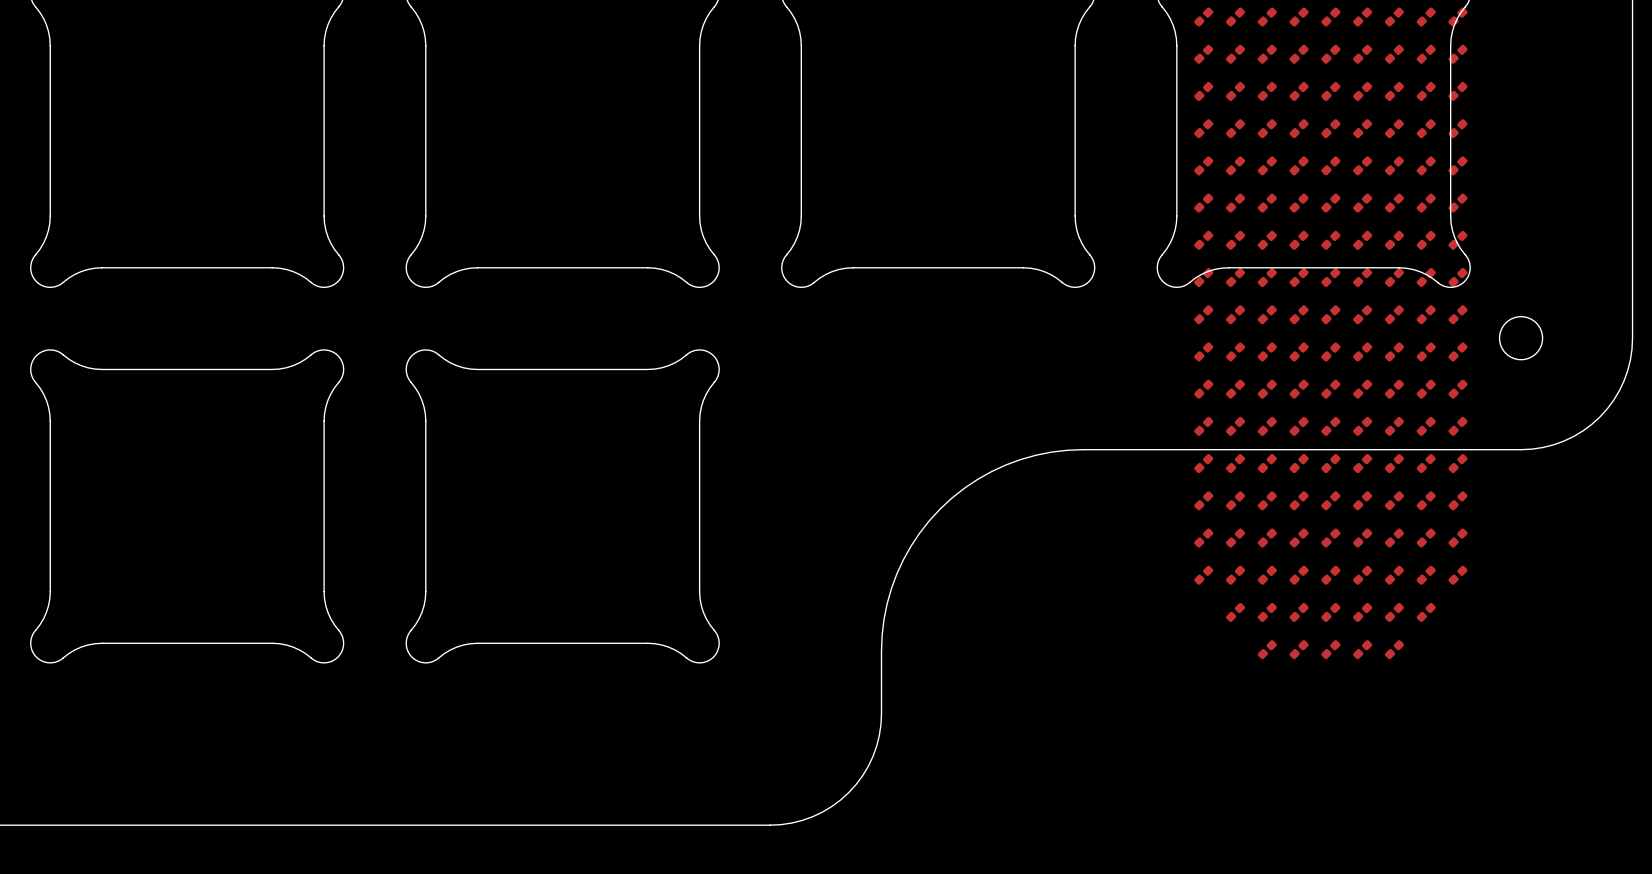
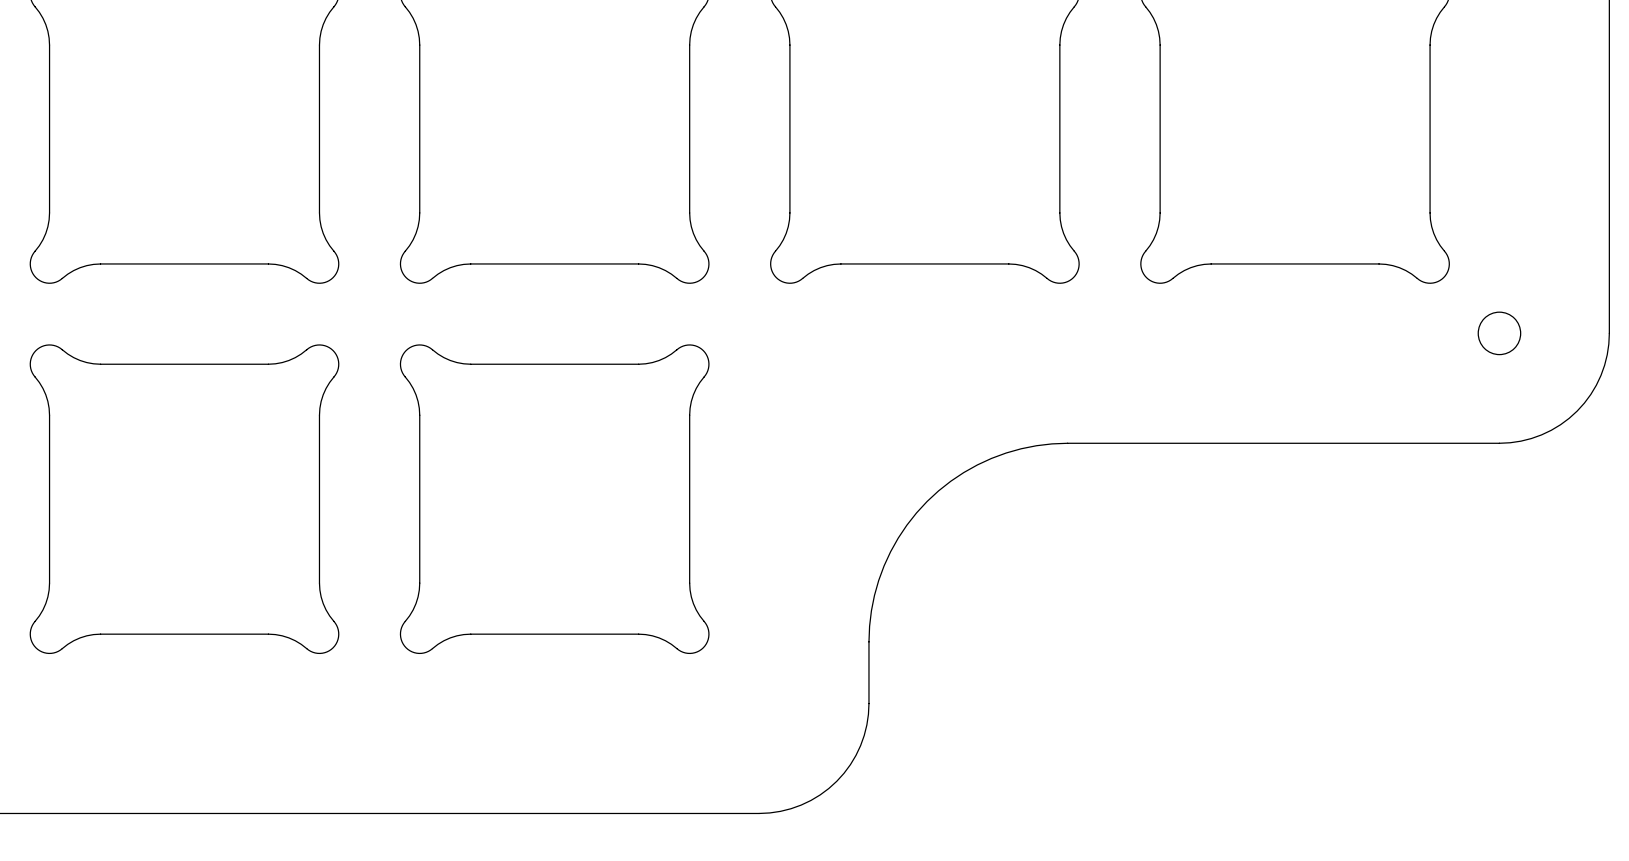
part: (1203, 17) -> none
part: (1235, 17) -> none
part: (1267, 17) -> none
part: (1299, 17) -> none
part: (1330, 17) -> none
part: (1362, 17) -> none
part: (1394, 17) -> none
part: (1426, 17) -> none
part: (1457, 17) -> none
part: (1203, 54) -> none
part: (1235, 54) -> none
part: (1267, 54) -> none
part: (1299, 54) -> none
part: (1330, 54) -> none
part: (1362, 54) -> none
part: (1394, 54) -> none
part: (1426, 54) -> none
part: (1457, 54) -> none
part: (1203, 91) -> none
part: (1235, 91) -> none
part: (1267, 91) -> none
part: (1299, 91) -> none
part: (1330, 91) -> none
part: (1362, 91) -> none
part: (1394, 91) -> none
part: (1426, 91) -> none
part: (1457, 91) -> none
part: (1203, 128) -> none
part: (1235, 128) -> none
part: (1267, 128) -> none
part: (1299, 128) -> none
part: (1330, 128) -> none
part: (1362, 128) -> none
part: (1394, 128) -> none
part: (1426, 128) -> none
part: (1457, 128) -> none
part: (1203, 165) -> none
part: (1235, 165) -> none
part: (1267, 165) -> none
part: (1299, 165) -> none
part: (1330, 165) -> none
part: (1362, 165) -> none
part: (1394, 165) -> none
part: (1426, 165) -> none
part: (1457, 165) -> none
part: (1203, 203) -> none
part: (1235, 203) -> none
part: (1267, 203) -> none
part: (1299, 203) -> none
part: (1330, 203) -> none
part: (1362, 203) -> none
part: (1394, 203) -> none
part: (1426, 203) -> none
part: (1457, 203) -> none
part: (1203, 240) -> none
part: (1235, 240) -> none
part: (1267, 240) -> none
part: (1299, 240) -> none
part: (1330, 240) -> none
part: (1362, 240) -> none
part: (1394, 240) -> none
part: (1426, 240) -> none
part: (1457, 240) -> none
part: (1203, 277) -> none
part: (1235, 277) -> none
part: (1267, 277) -> none
part: (1299, 277) -> none
part: (1330, 277) -> none
part: (1362, 277) -> none
part: (1394, 277) -> none
part: (1426, 277) -> none
part: (1457, 277) -> none
part: (1203, 314) -> none
part: (1235, 314) -> none
part: (1267, 314) -> none
part: (1299, 314) -> none
part: (1330, 314) -> none
part: (1362, 314) -> none
part: (1394, 314) -> none
part: (1426, 314) -> none
part: (1457, 314) -> none
part: (1203, 351) -> none
part: (1235, 351) -> none
part: (1267, 351) -> none
part: (1299, 351) -> none
part: (1330, 351) -> none
part: (1362, 351) -> none
part: (1394, 351) -> none
part: (1426, 351) -> none
part: (1457, 351) -> none
part: (1203, 389) -> none
part: (1235, 389) -> none
part: (1267, 389) -> none
part: (1299, 389) -> none
part: (1330, 389) -> none
part: (1362, 389) -> none
part: (1394, 389) -> none
part: (1426, 389) -> none
part: (1457, 389) -> none
part: (1203, 426) -> none
part: (1235, 426) -> none
part: (1267, 426) -> none
part: (1299, 426) -> none
part: (1330, 426) -> none
part: (1362, 426) -> none
part: (1394, 426) -> none
part: (1426, 426) -> none
part: (1457, 426) -> none
part: (1203, 463) -> none
part: (1235, 463) -> none
part: (1267, 463) -> none
part: (1299, 463) -> none
part: (1330, 463) -> none
part: (1362, 463) -> none
part: (1394, 463) -> none
part: (1426, 463) -> none
part: (1457, 463) -> none
part: (1203, 500) -> none
part: (1235, 500) -> none
part: (1267, 500) -> none
part: (1299, 500) -> none
part: (1330, 500) -> none
part: (1362, 500) -> none
part: (1394, 500) -> none
part: (1426, 500) -> none
part: (1457, 500) -> none
part: (1203, 538) -> none
part: (1235, 538) -> none
part: (1267, 538) -> none
part: (1299, 538) -> none
part: (1330, 538) -> none
part: (1362, 538) -> none
part: (1394, 538) -> none
part: (1426, 538) -> none
part: (1457, 538) -> none
part: (1203, 575) -> none
part: (1235, 575) -> none
part: (1267, 575) -> none
part: (1299, 575) -> none
part: (1330, 575) -> none
part: (1362, 575) -> none
part: (1394, 575) -> none
part: (1426, 575) -> none
part: (1457, 575) -> none
part: (1235, 612) -> none
part: (1267, 612) -> none
part: (1299, 612) -> none
part: (1330, 612) -> none
part: (1362, 612) -> none
part: (1394, 612) -> none
part: (1426, 612) -> none
part: (1267, 649) -> none
part: (1299, 649) -> none
part: (1330, 649) -> none
part: (1362, 649) -> none
part: (1394, 649) -> none

